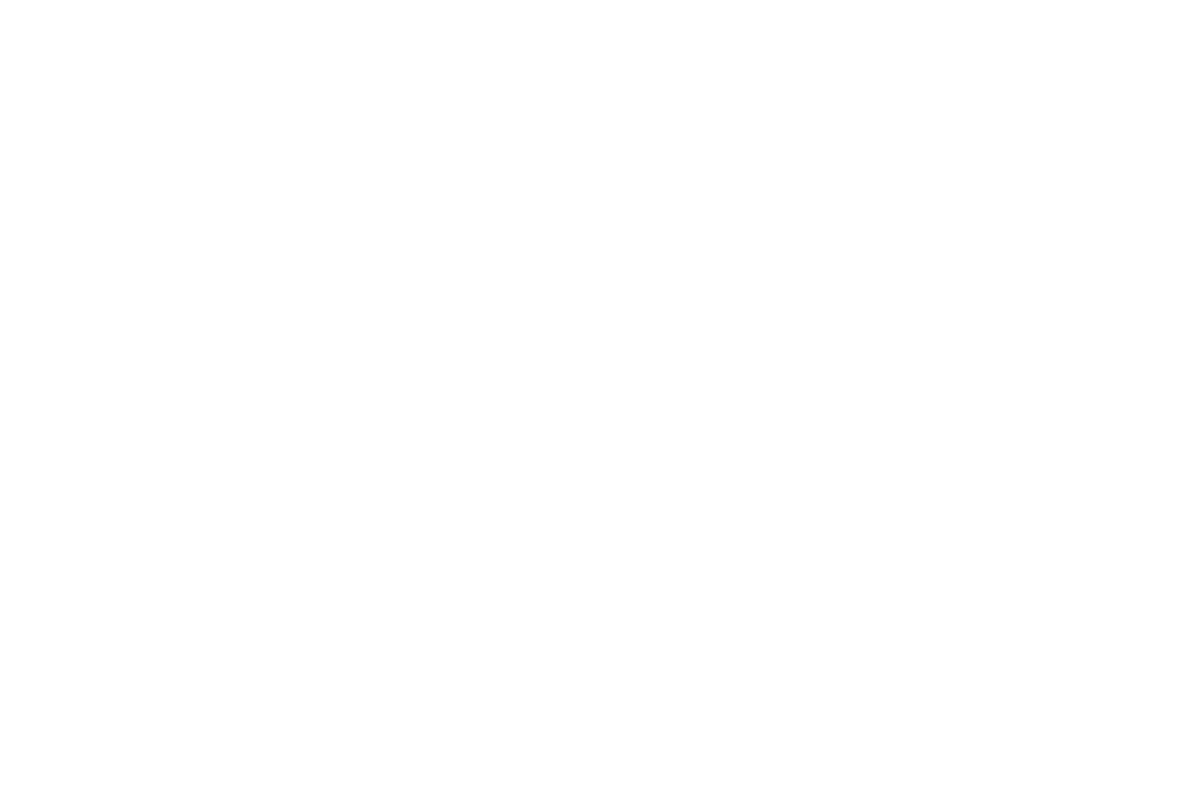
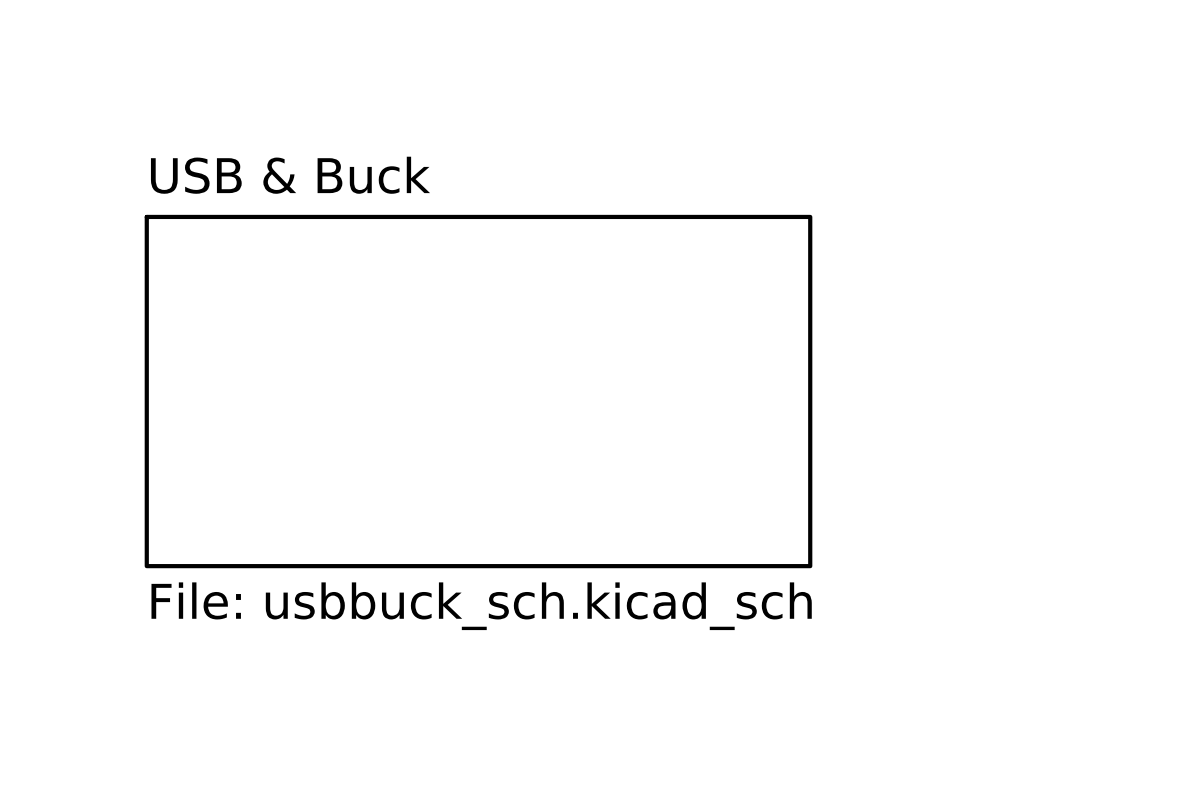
sheet USB & Buck: none -> File: usbbuck_sch.kicad_sch (478, 391)

